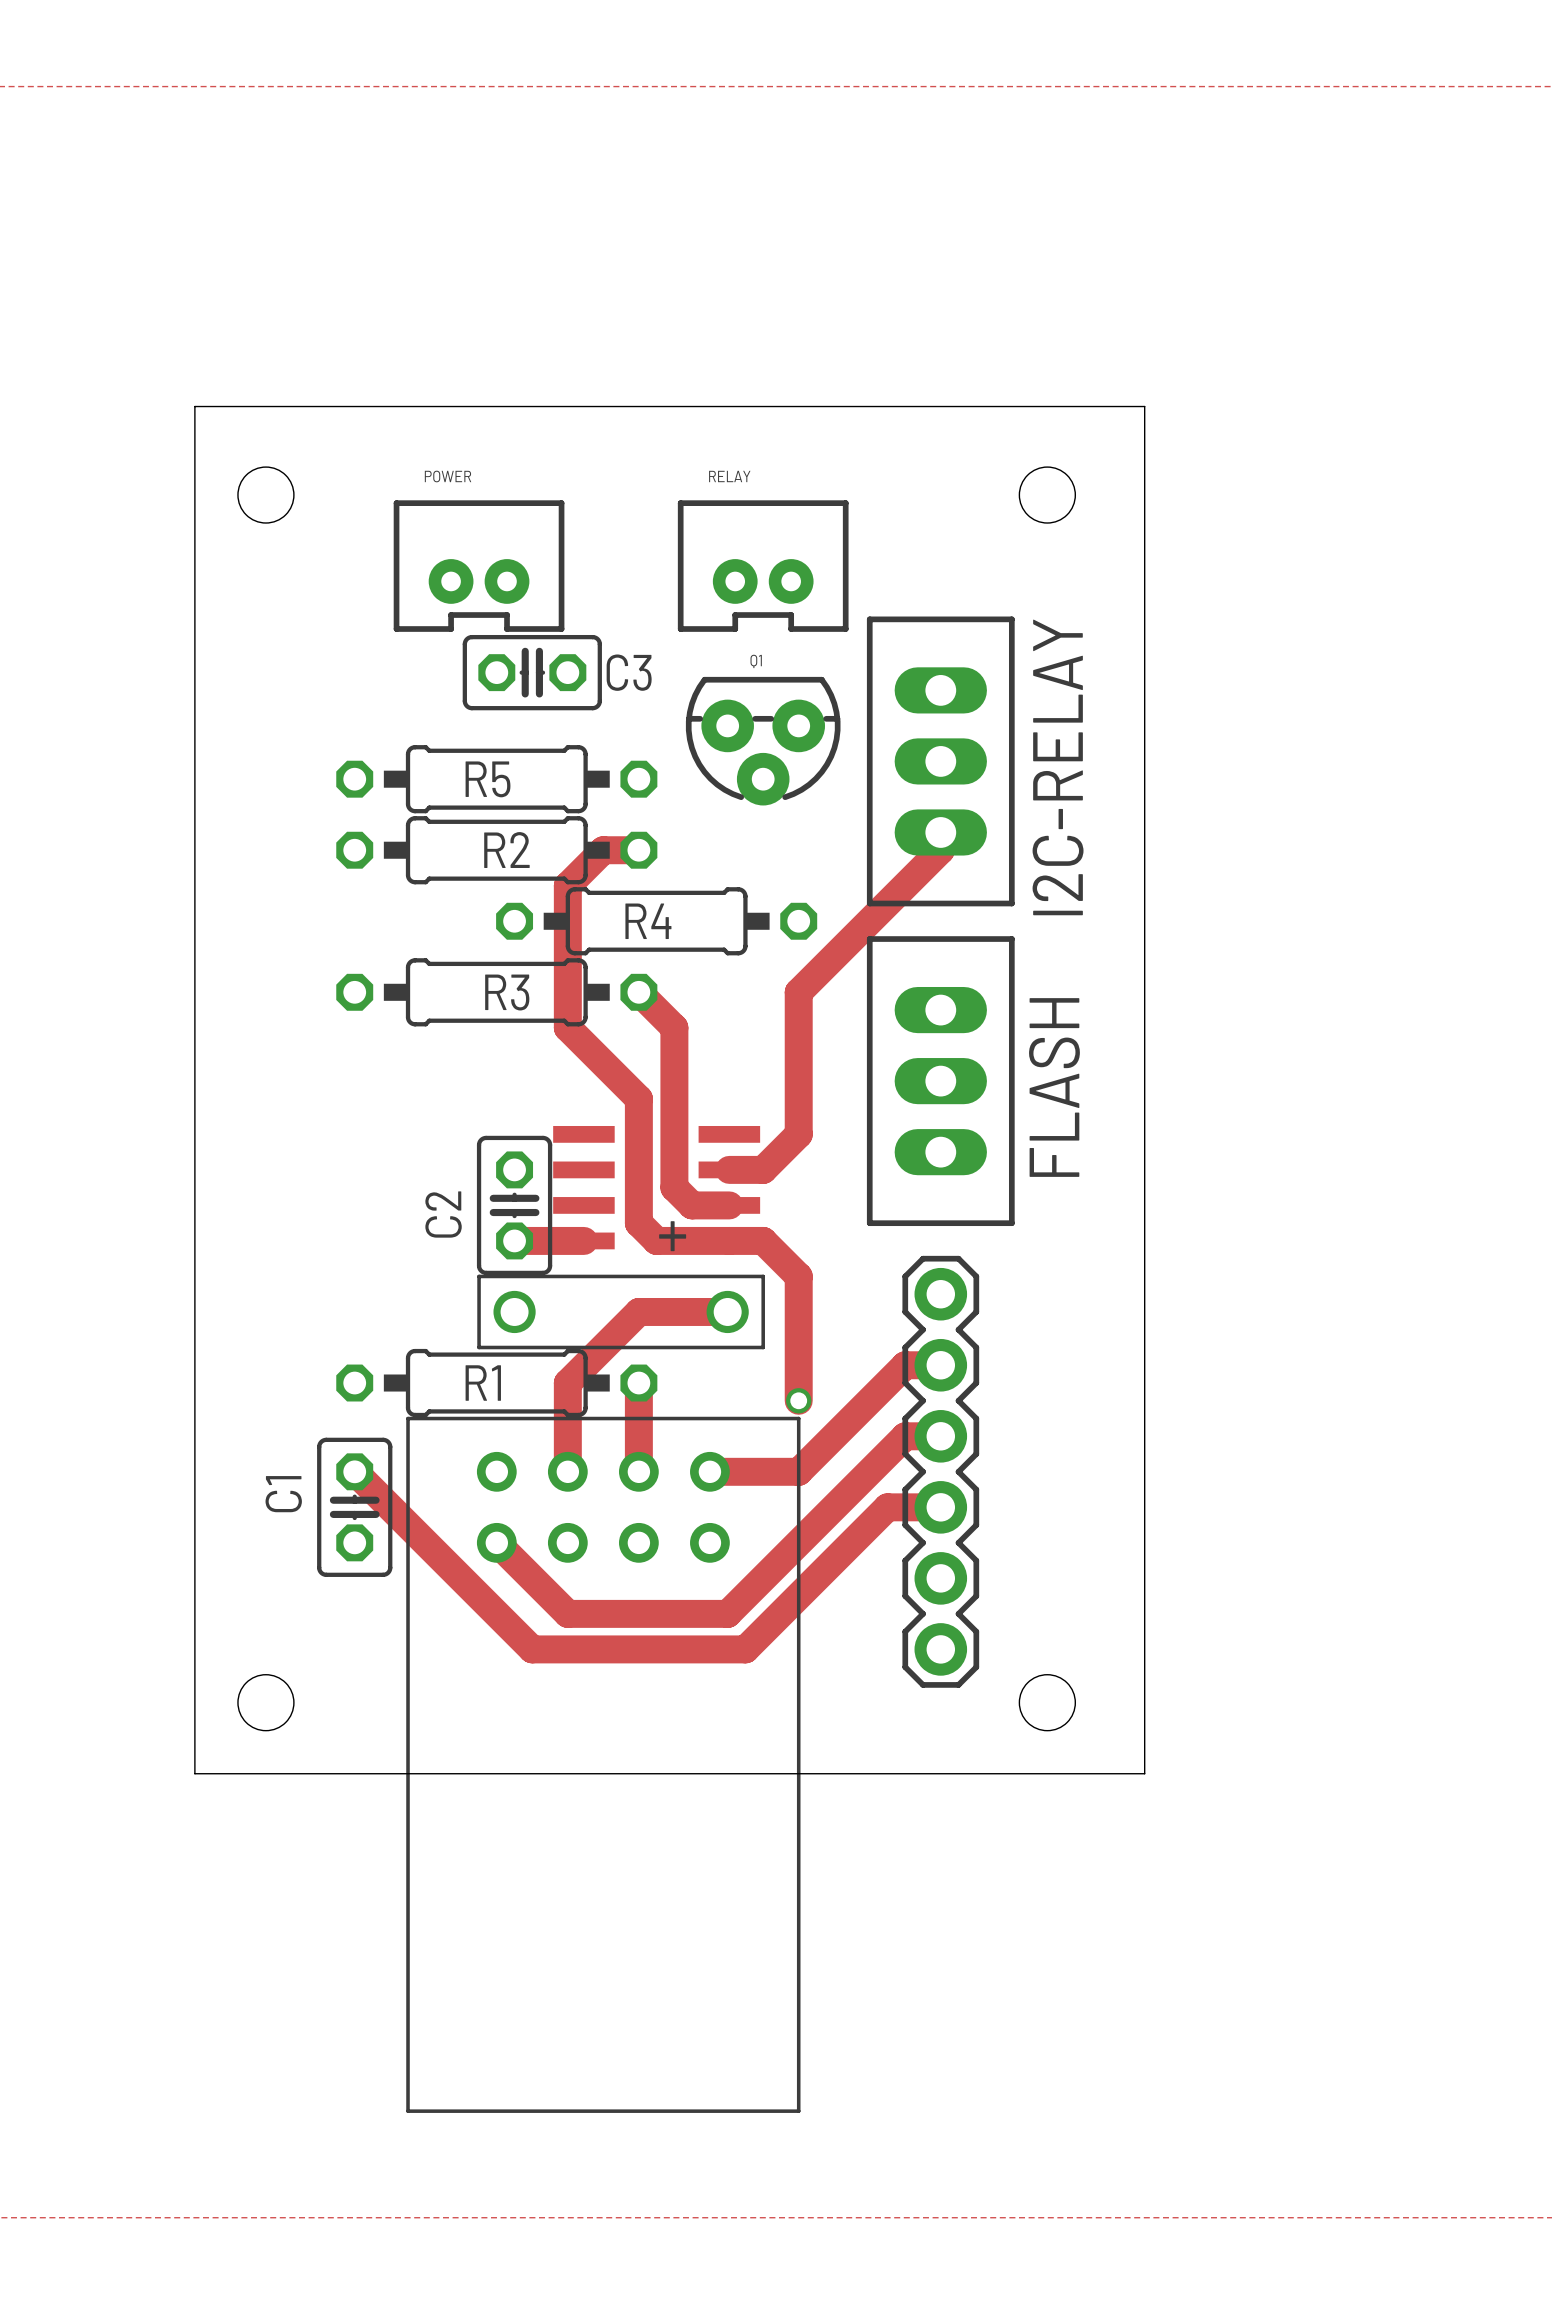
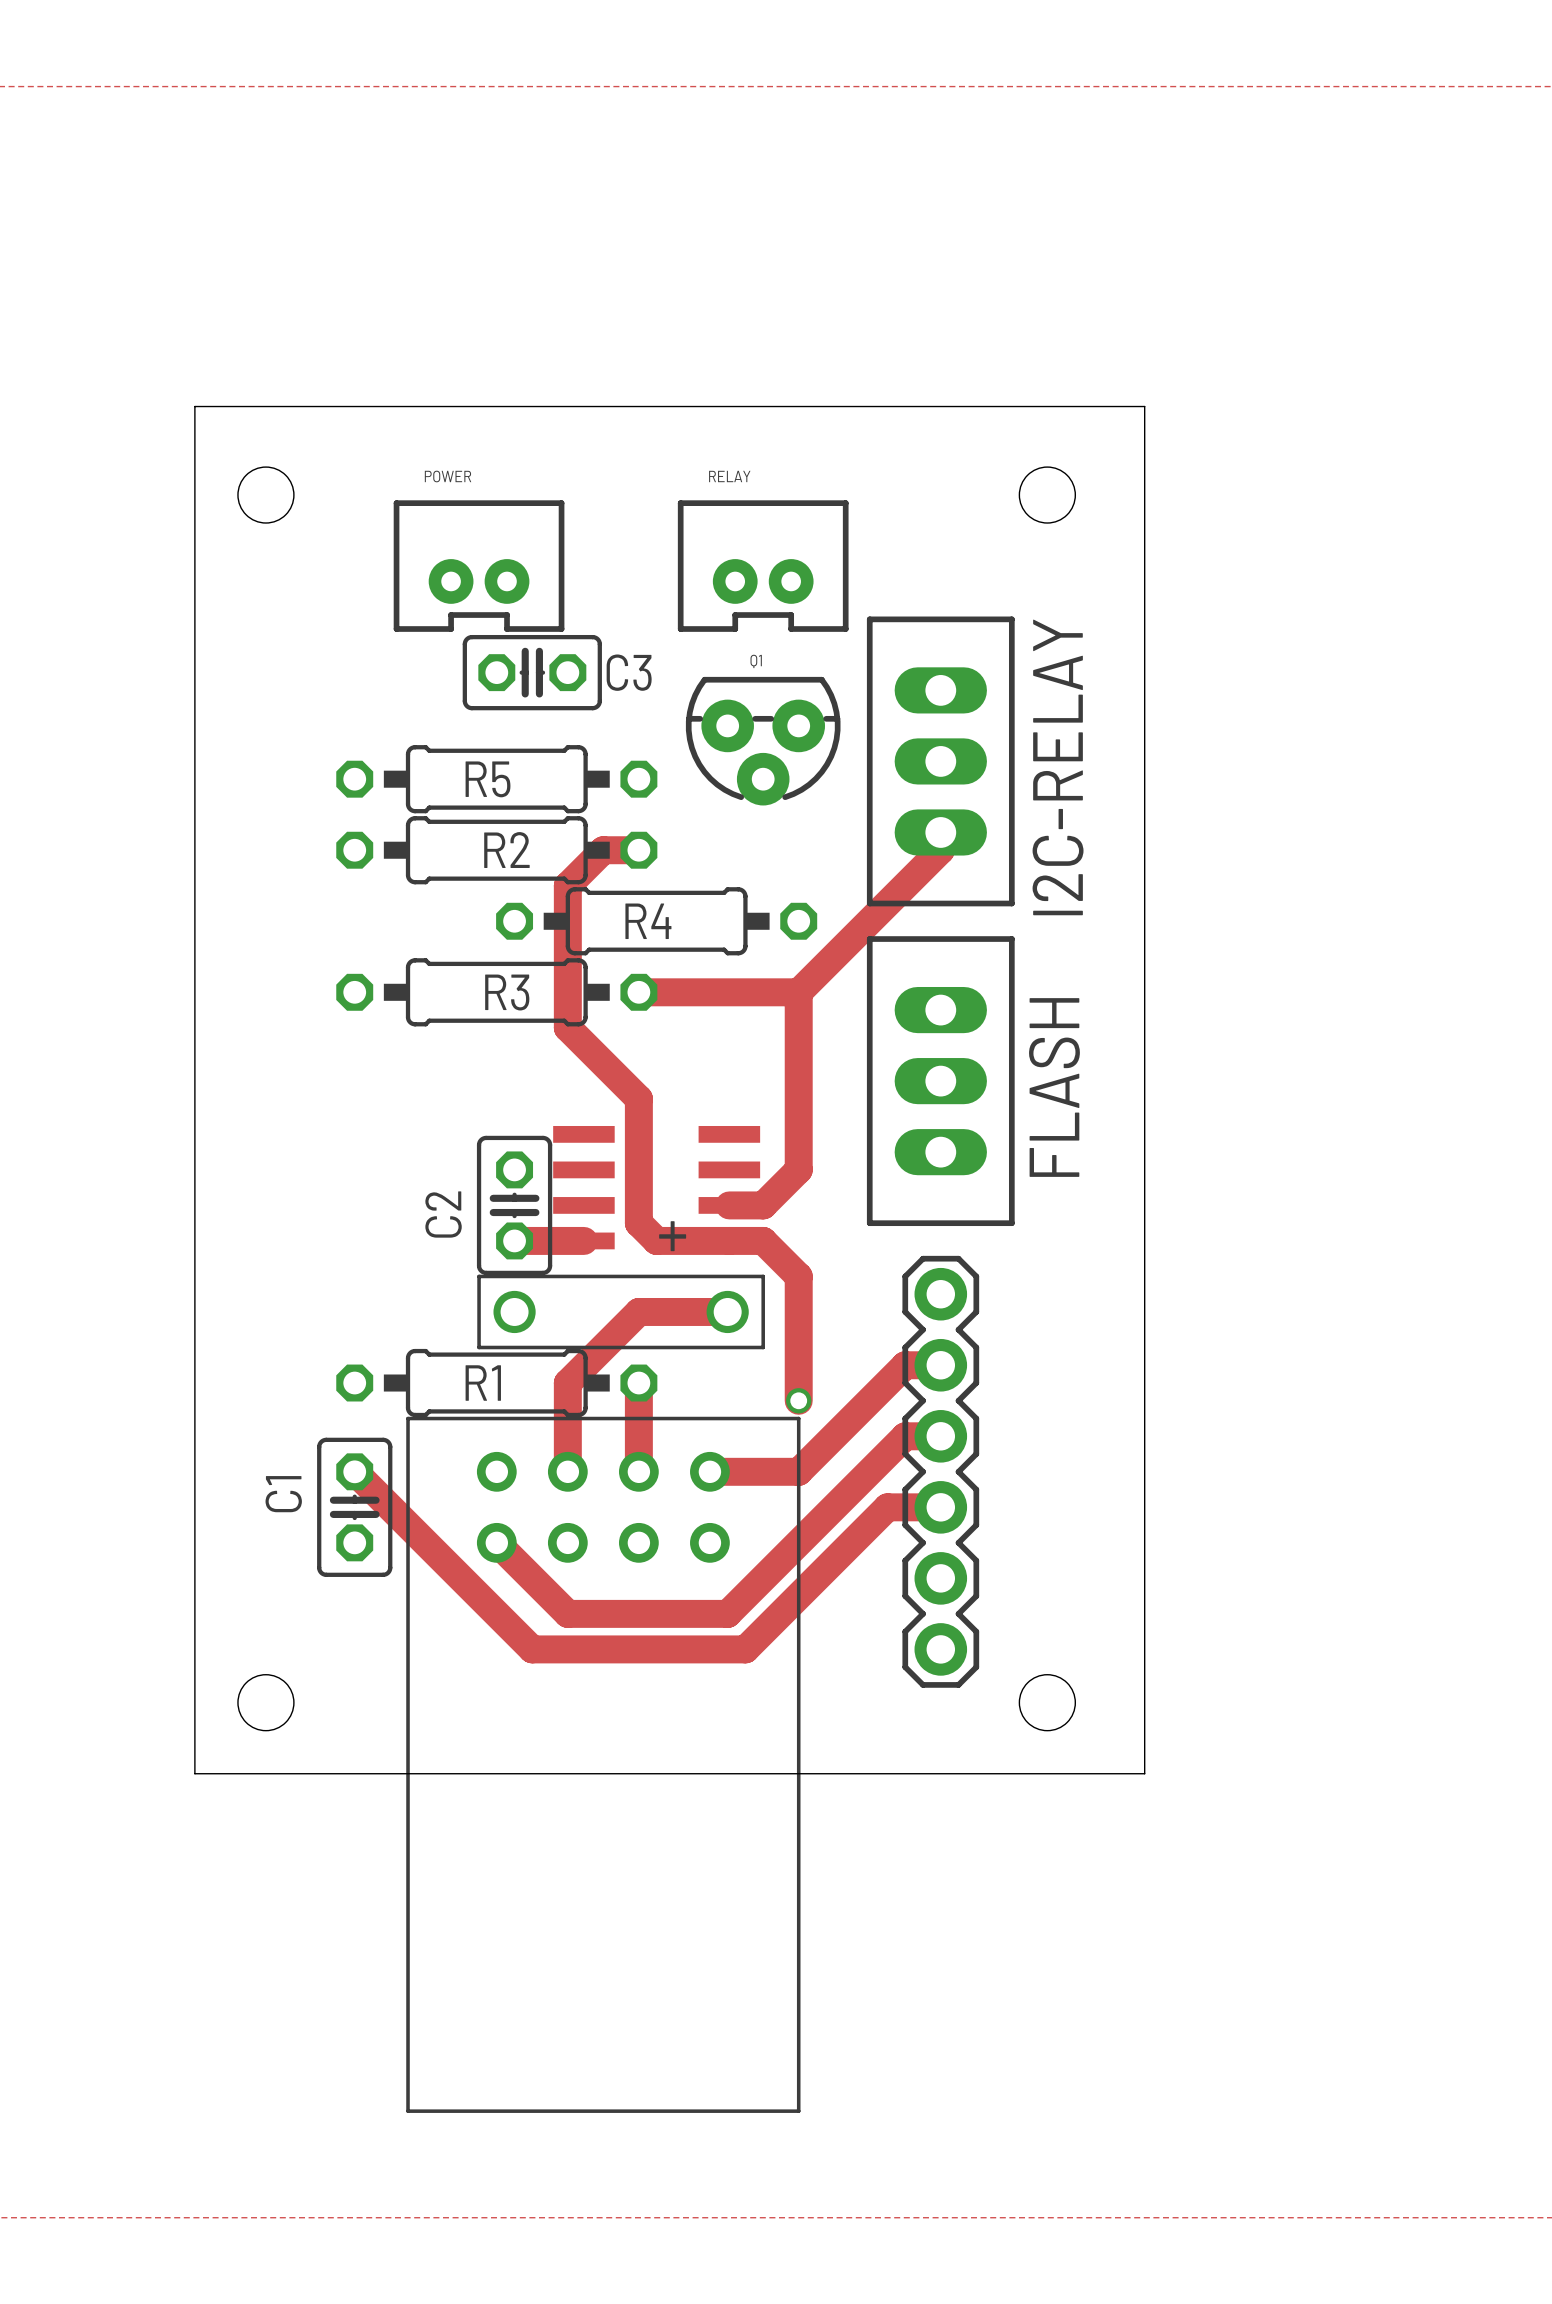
track: (638, 992) (674, 1027) (674, 1187) (692, 1205) (729, 1205) -> (638, 992) (798, 992)
track: (798, 1134) (763, 1169) (729, 1169) -> (798, 1134) (798, 1169) (763, 1205) (729, 1205)

